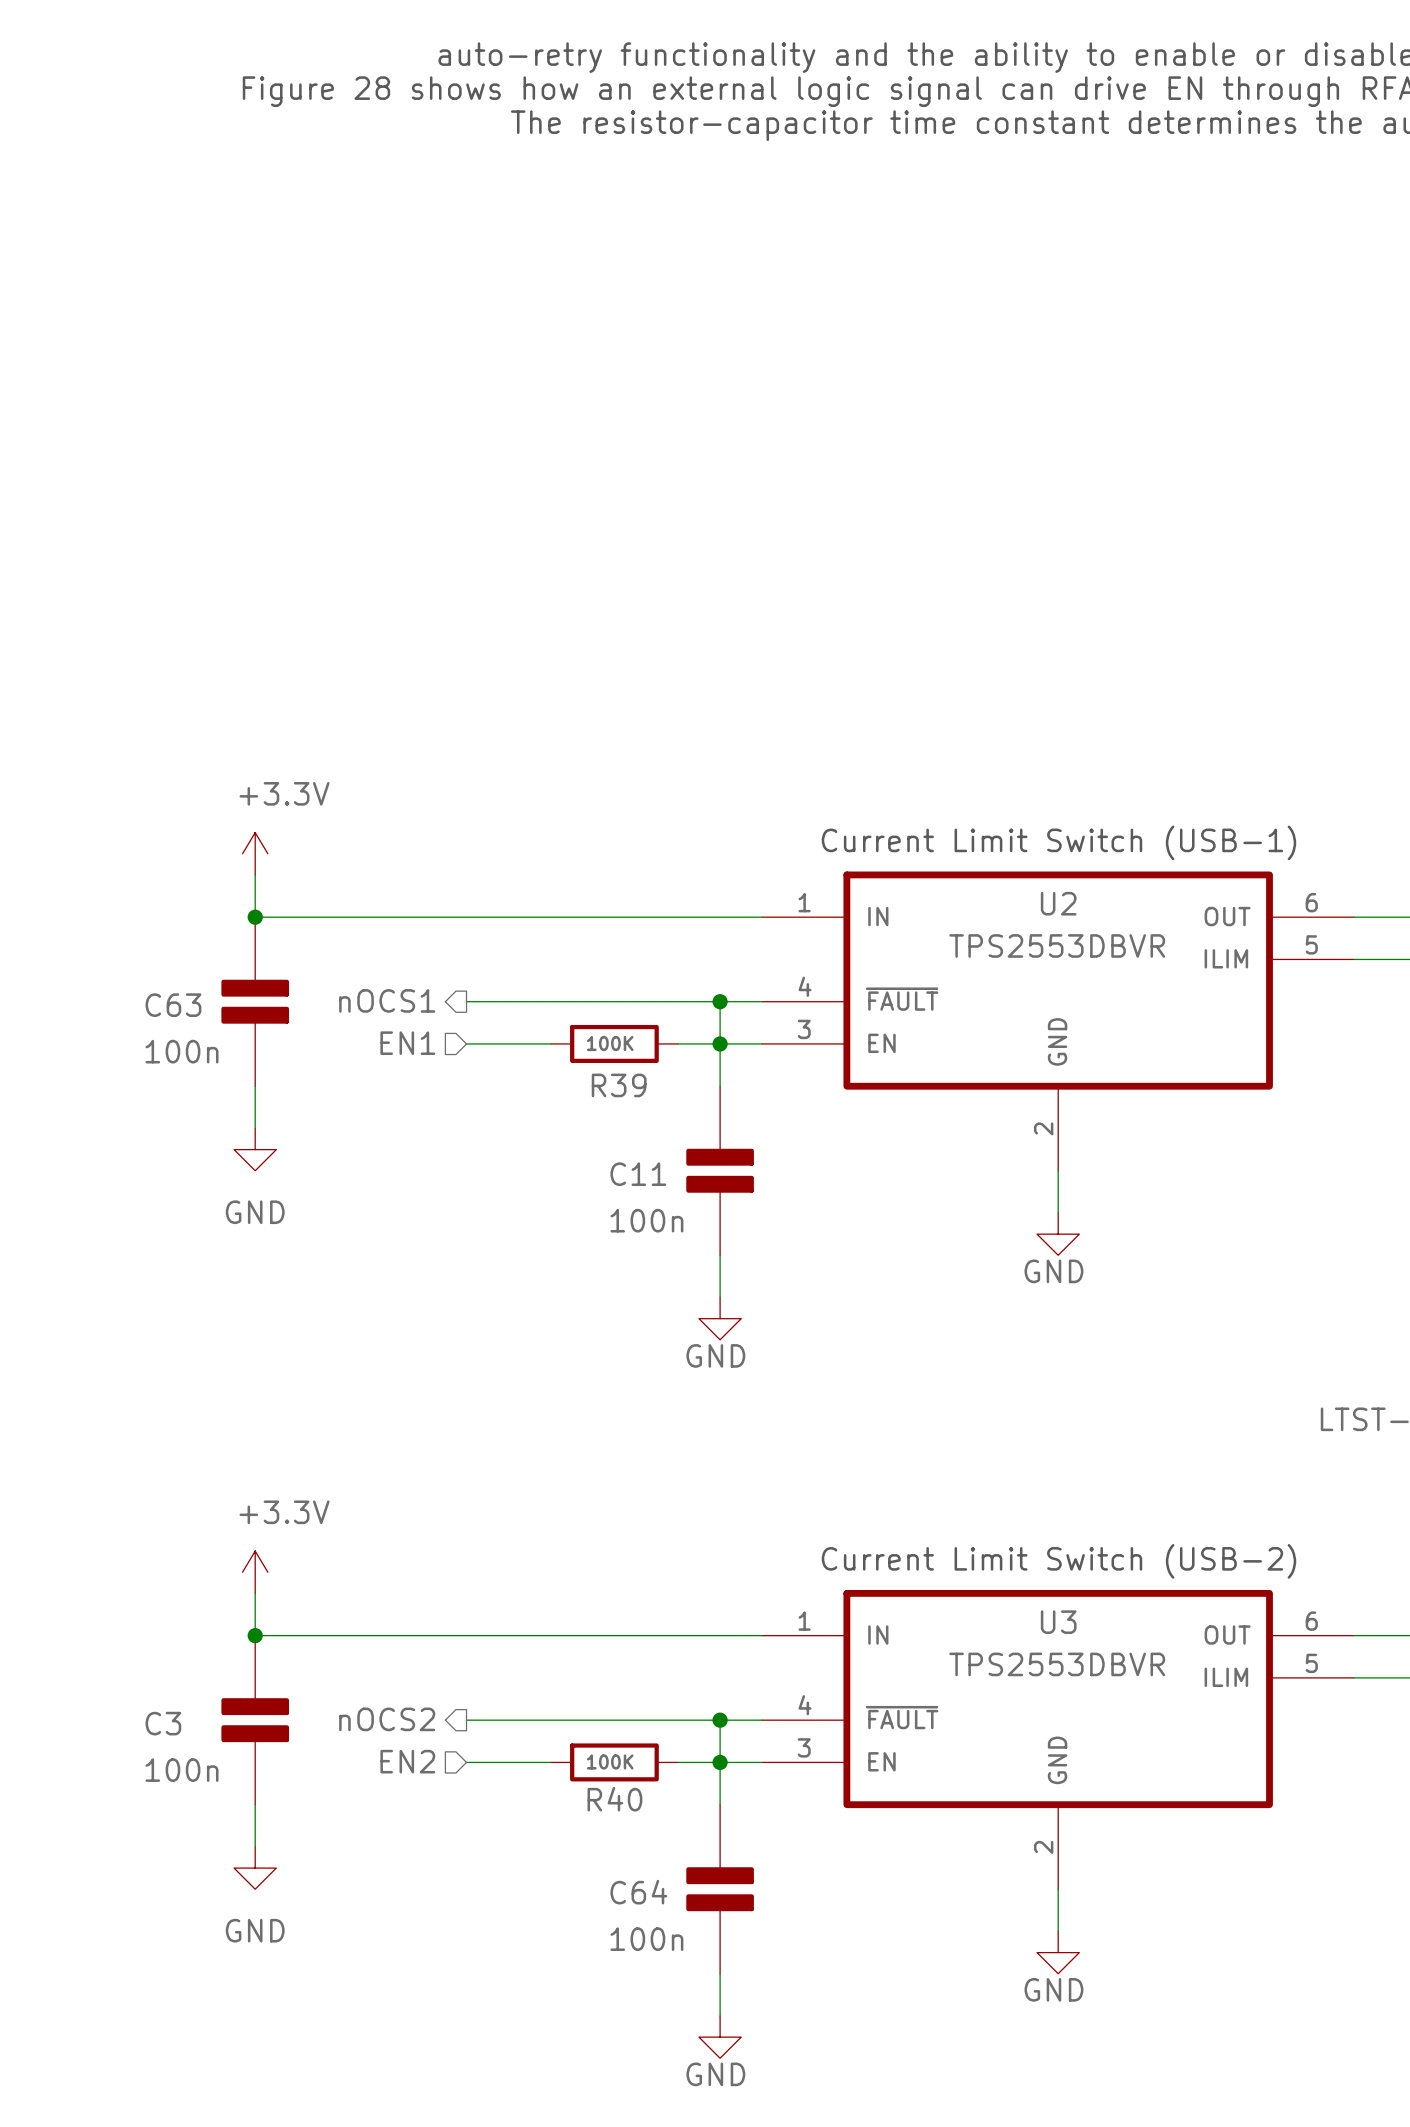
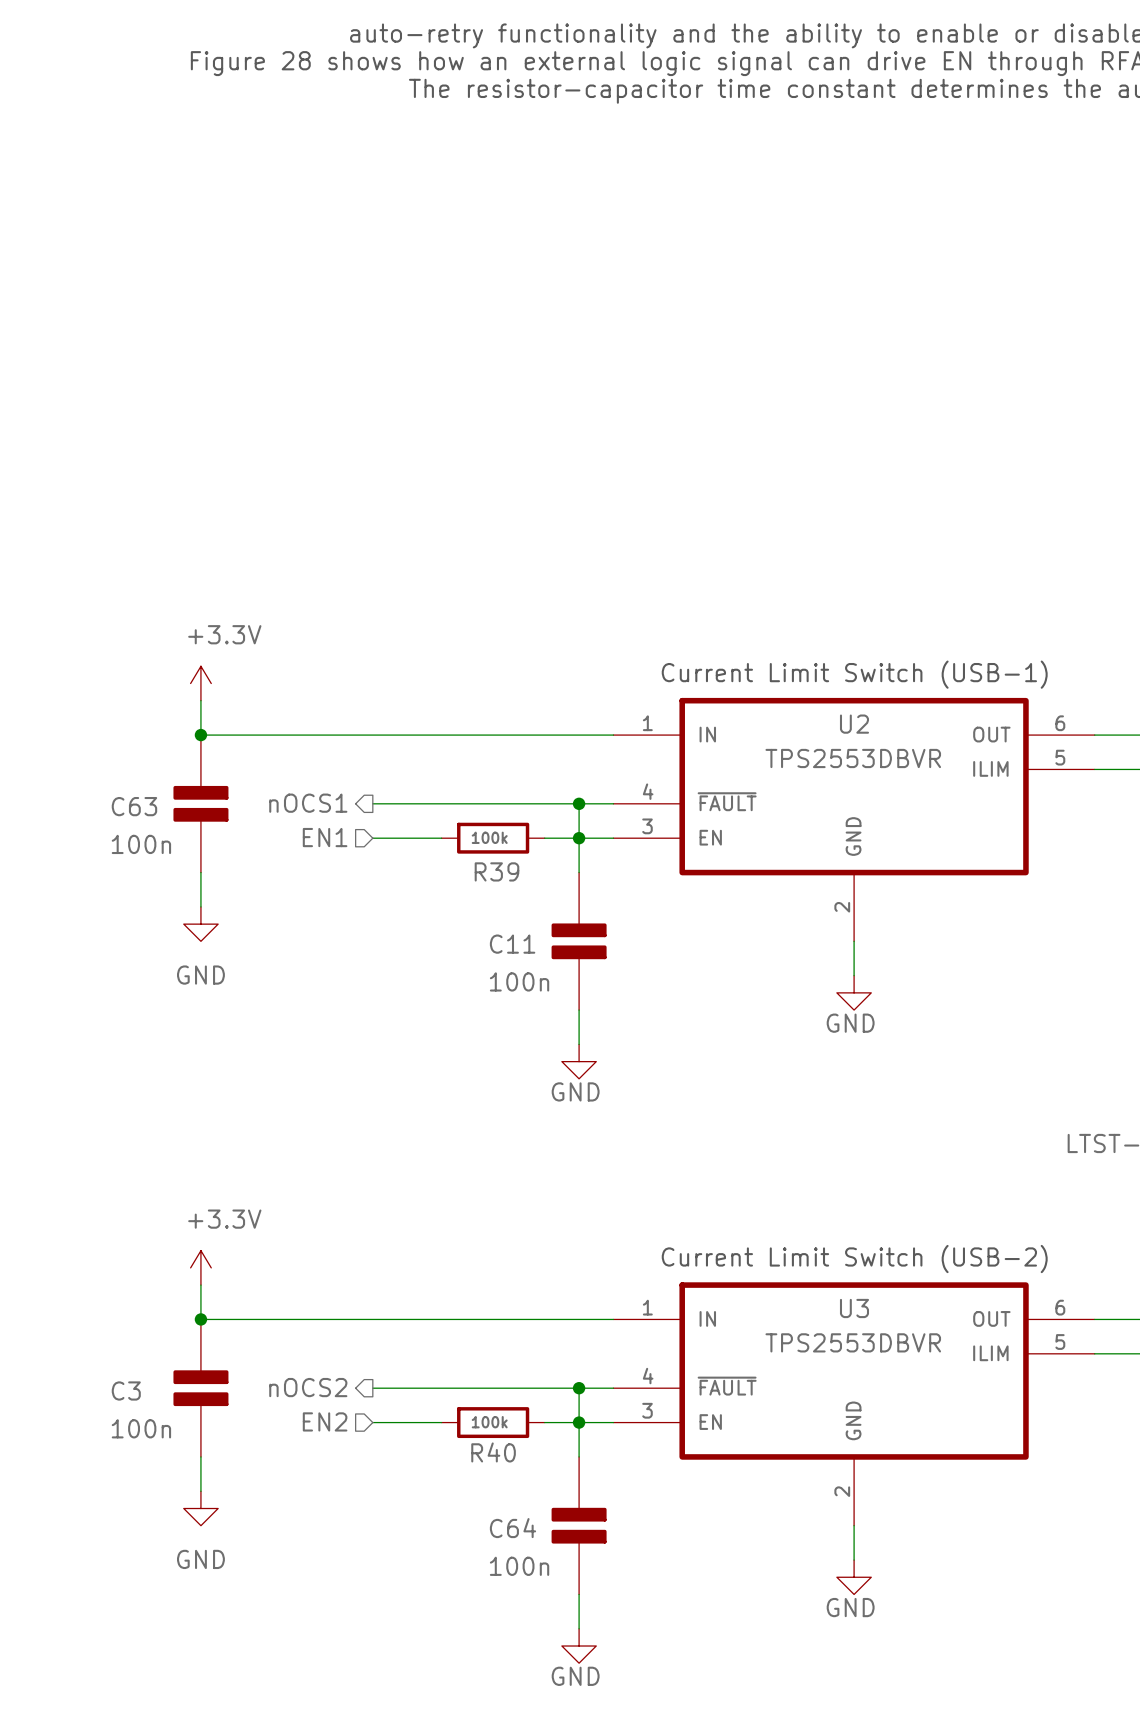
R39 value: 100K (610, 1043) -> 100k (489, 837)
R40 value: 100K (610, 1761) -> 100k (489, 1422)

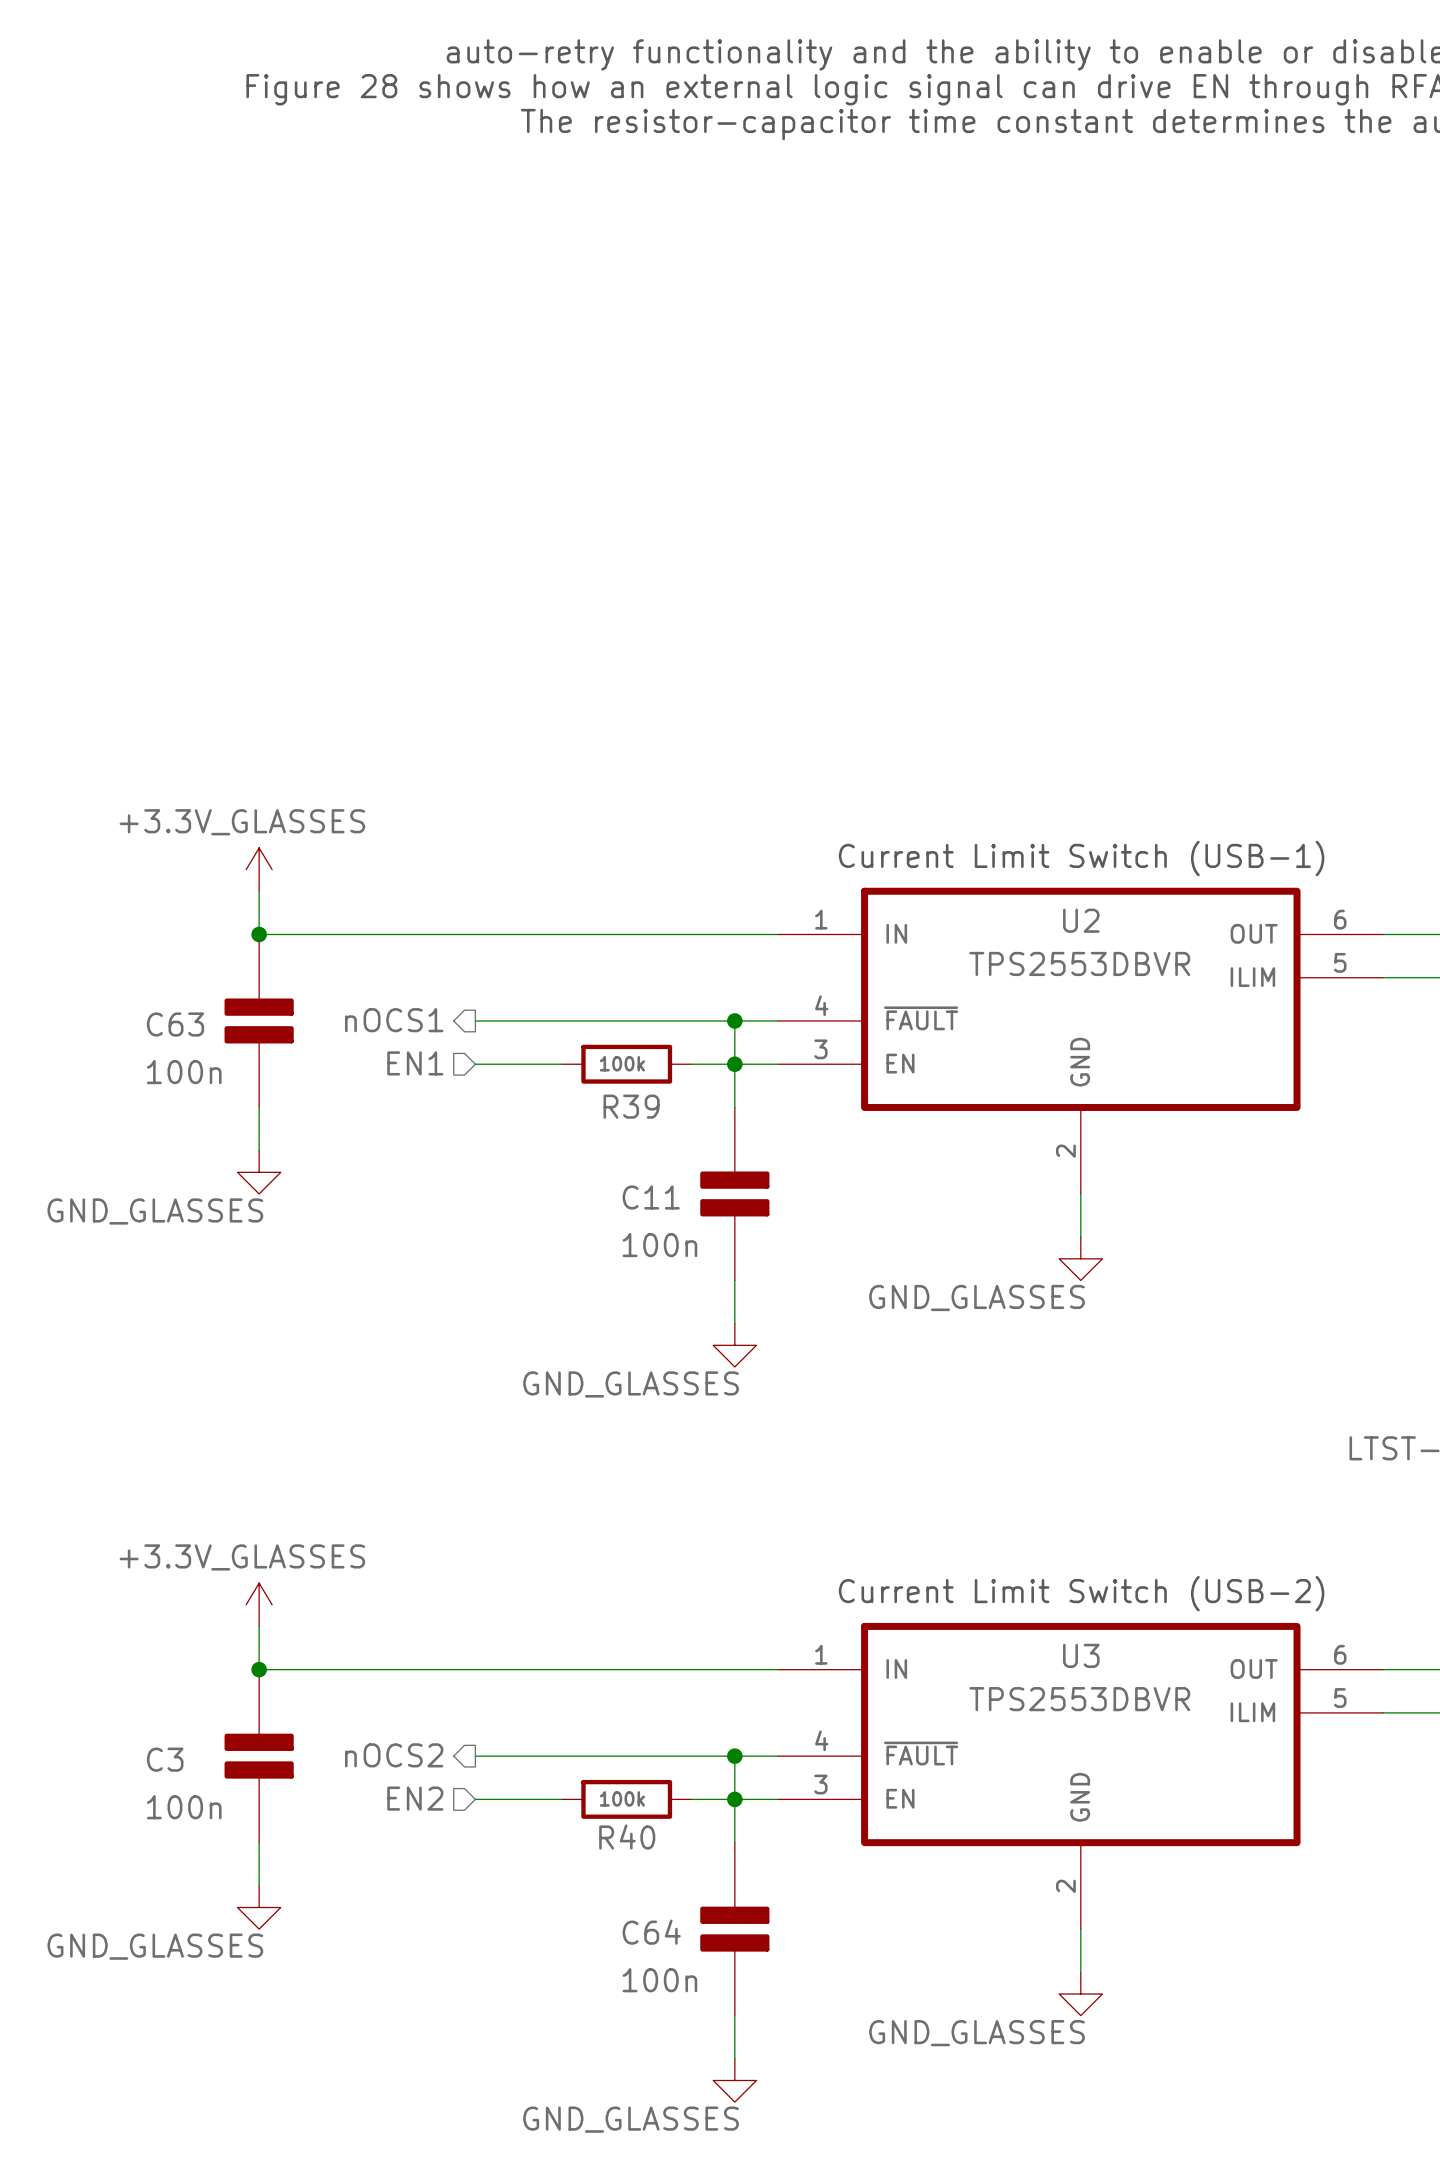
power symbol: +3.3V (200, 683) -> +3.3V_GLASSES (259, 869)
power symbol: GND (200, 924) -> GND_GLASSES (259, 1172)
power symbol: GND (854, 992) -> GND_GLASSES (1080, 1258)
power symbol: GND (579, 1061) -> GND_GLASSES (734, 1345)
power symbol: +3.3V (200, 1267) -> +3.3V_GLASSES (259, 1604)
power symbol: GND (200, 1508) -> GND_GLASSES (259, 1907)
power symbol: GND (854, 1577) -> GND_GLASSES (1080, 1994)
power symbol: GND (579, 1646) -> GND_GLASSES (734, 2080)

